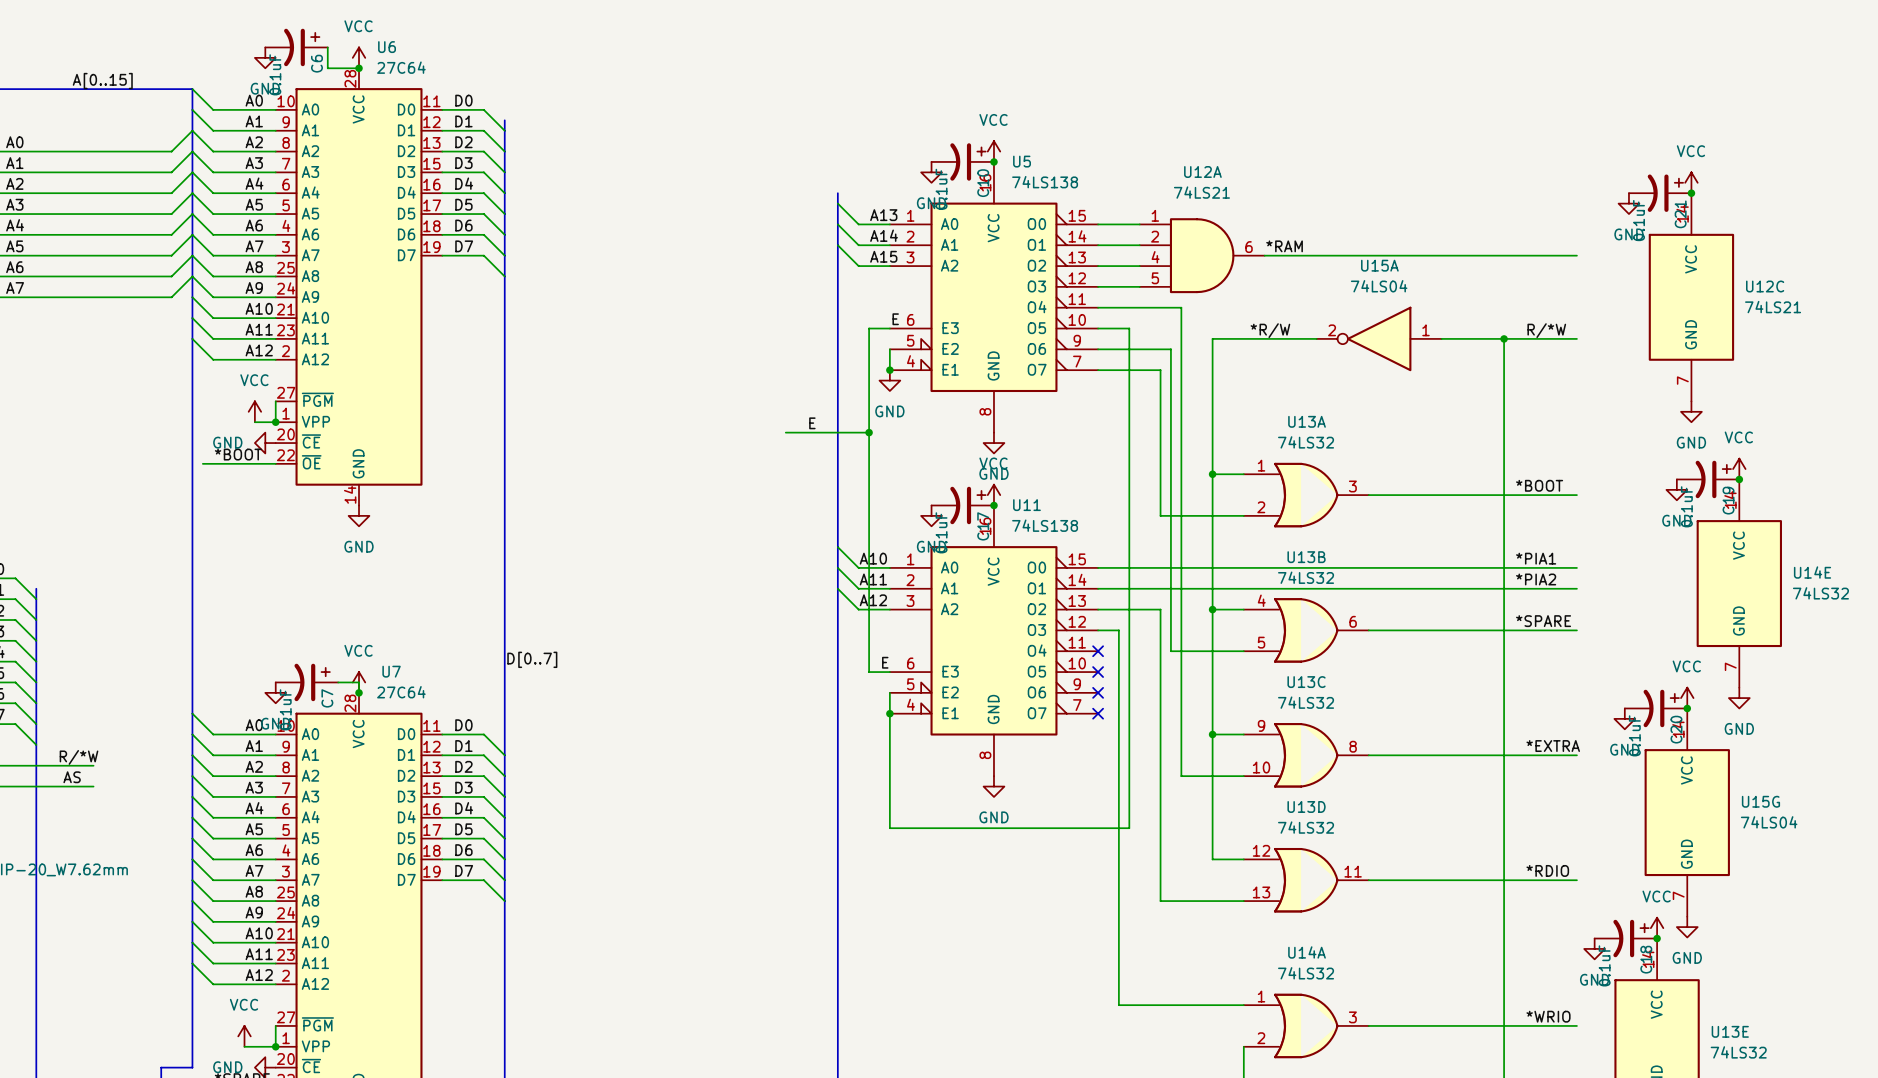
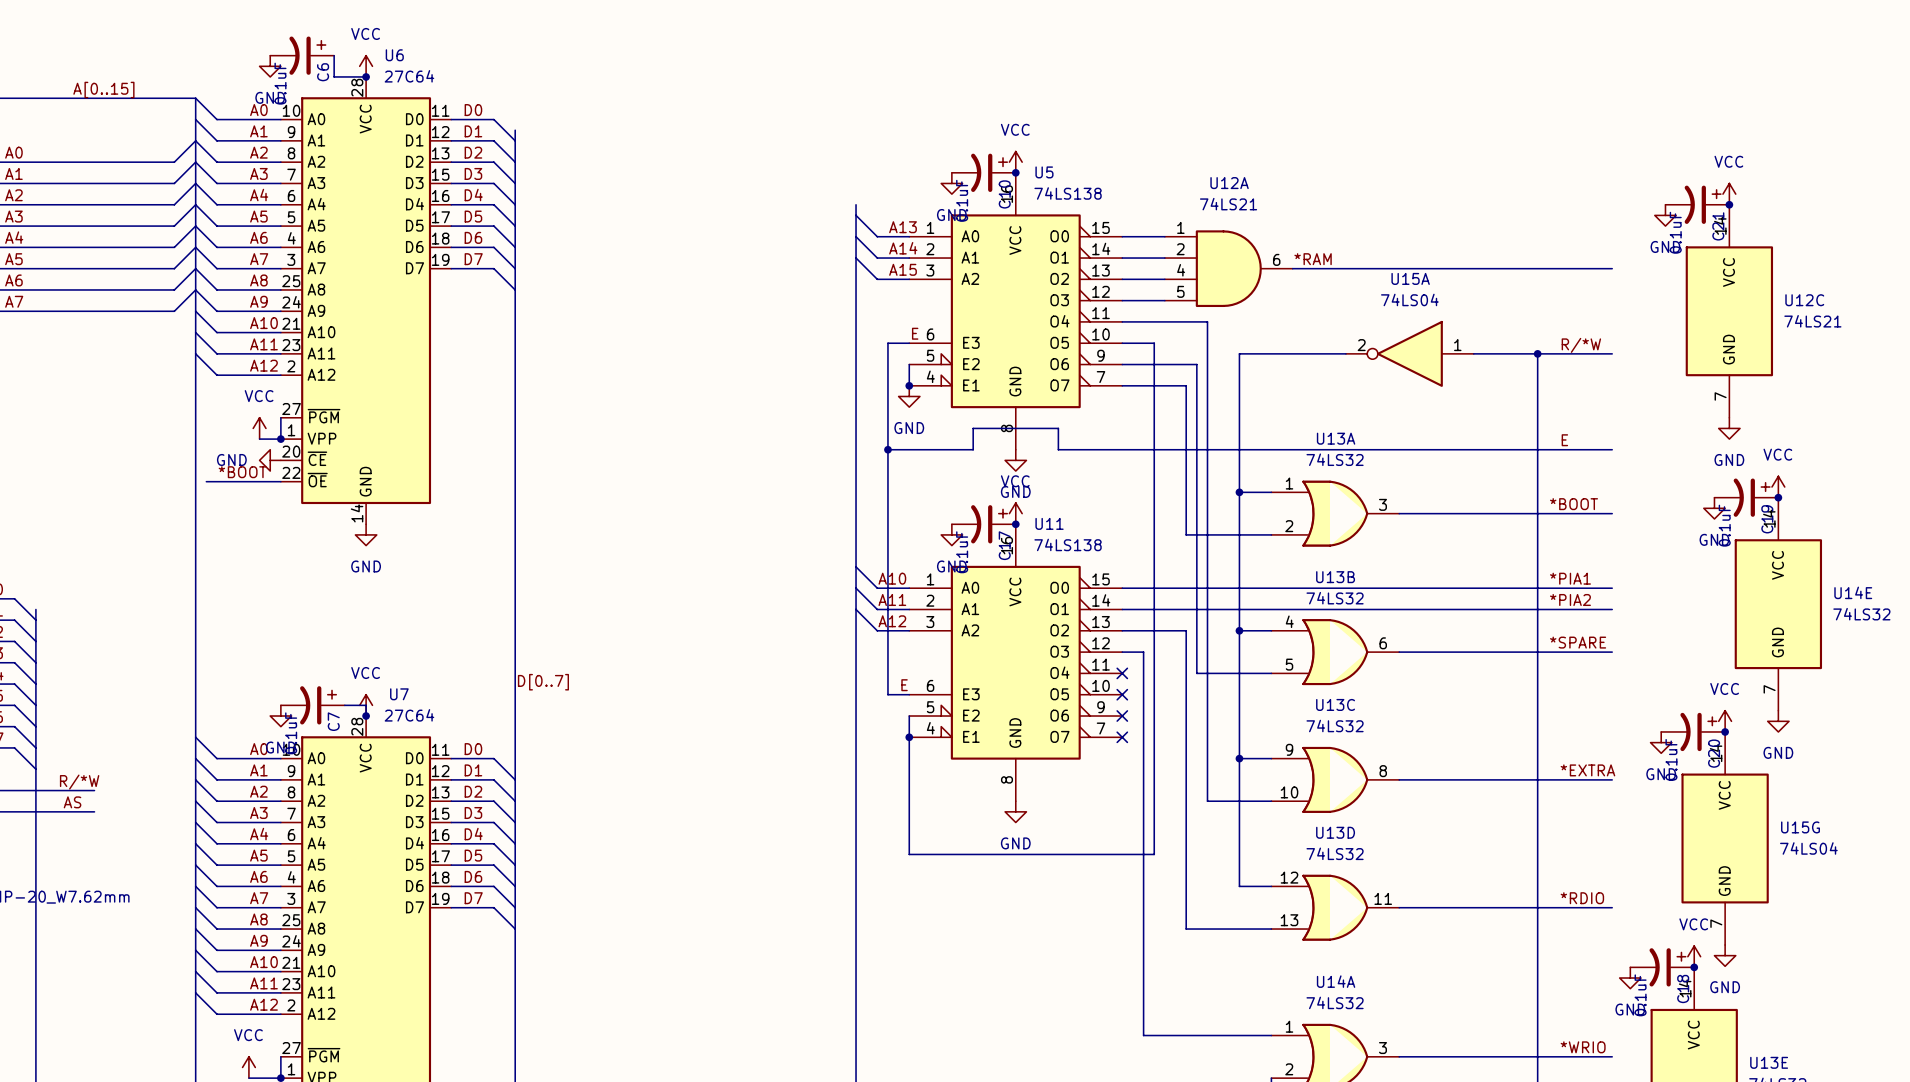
label: *R/W (1270, 330) -> none
label: E (812, 423) -> none
label: none -> E (1564, 440)
wire: (785, 432) (869, 432) -> (1612, 449) (1058, 449) (1058, 428) (973, 428) (973, 449) (887, 449)

